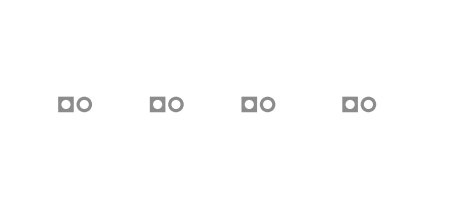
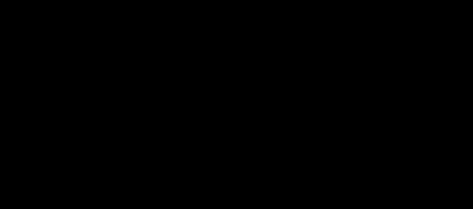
part: (75, 104) -> none
part: (166, 104) -> none
part: (258, 104) -> none
part: (359, 104) -> none

